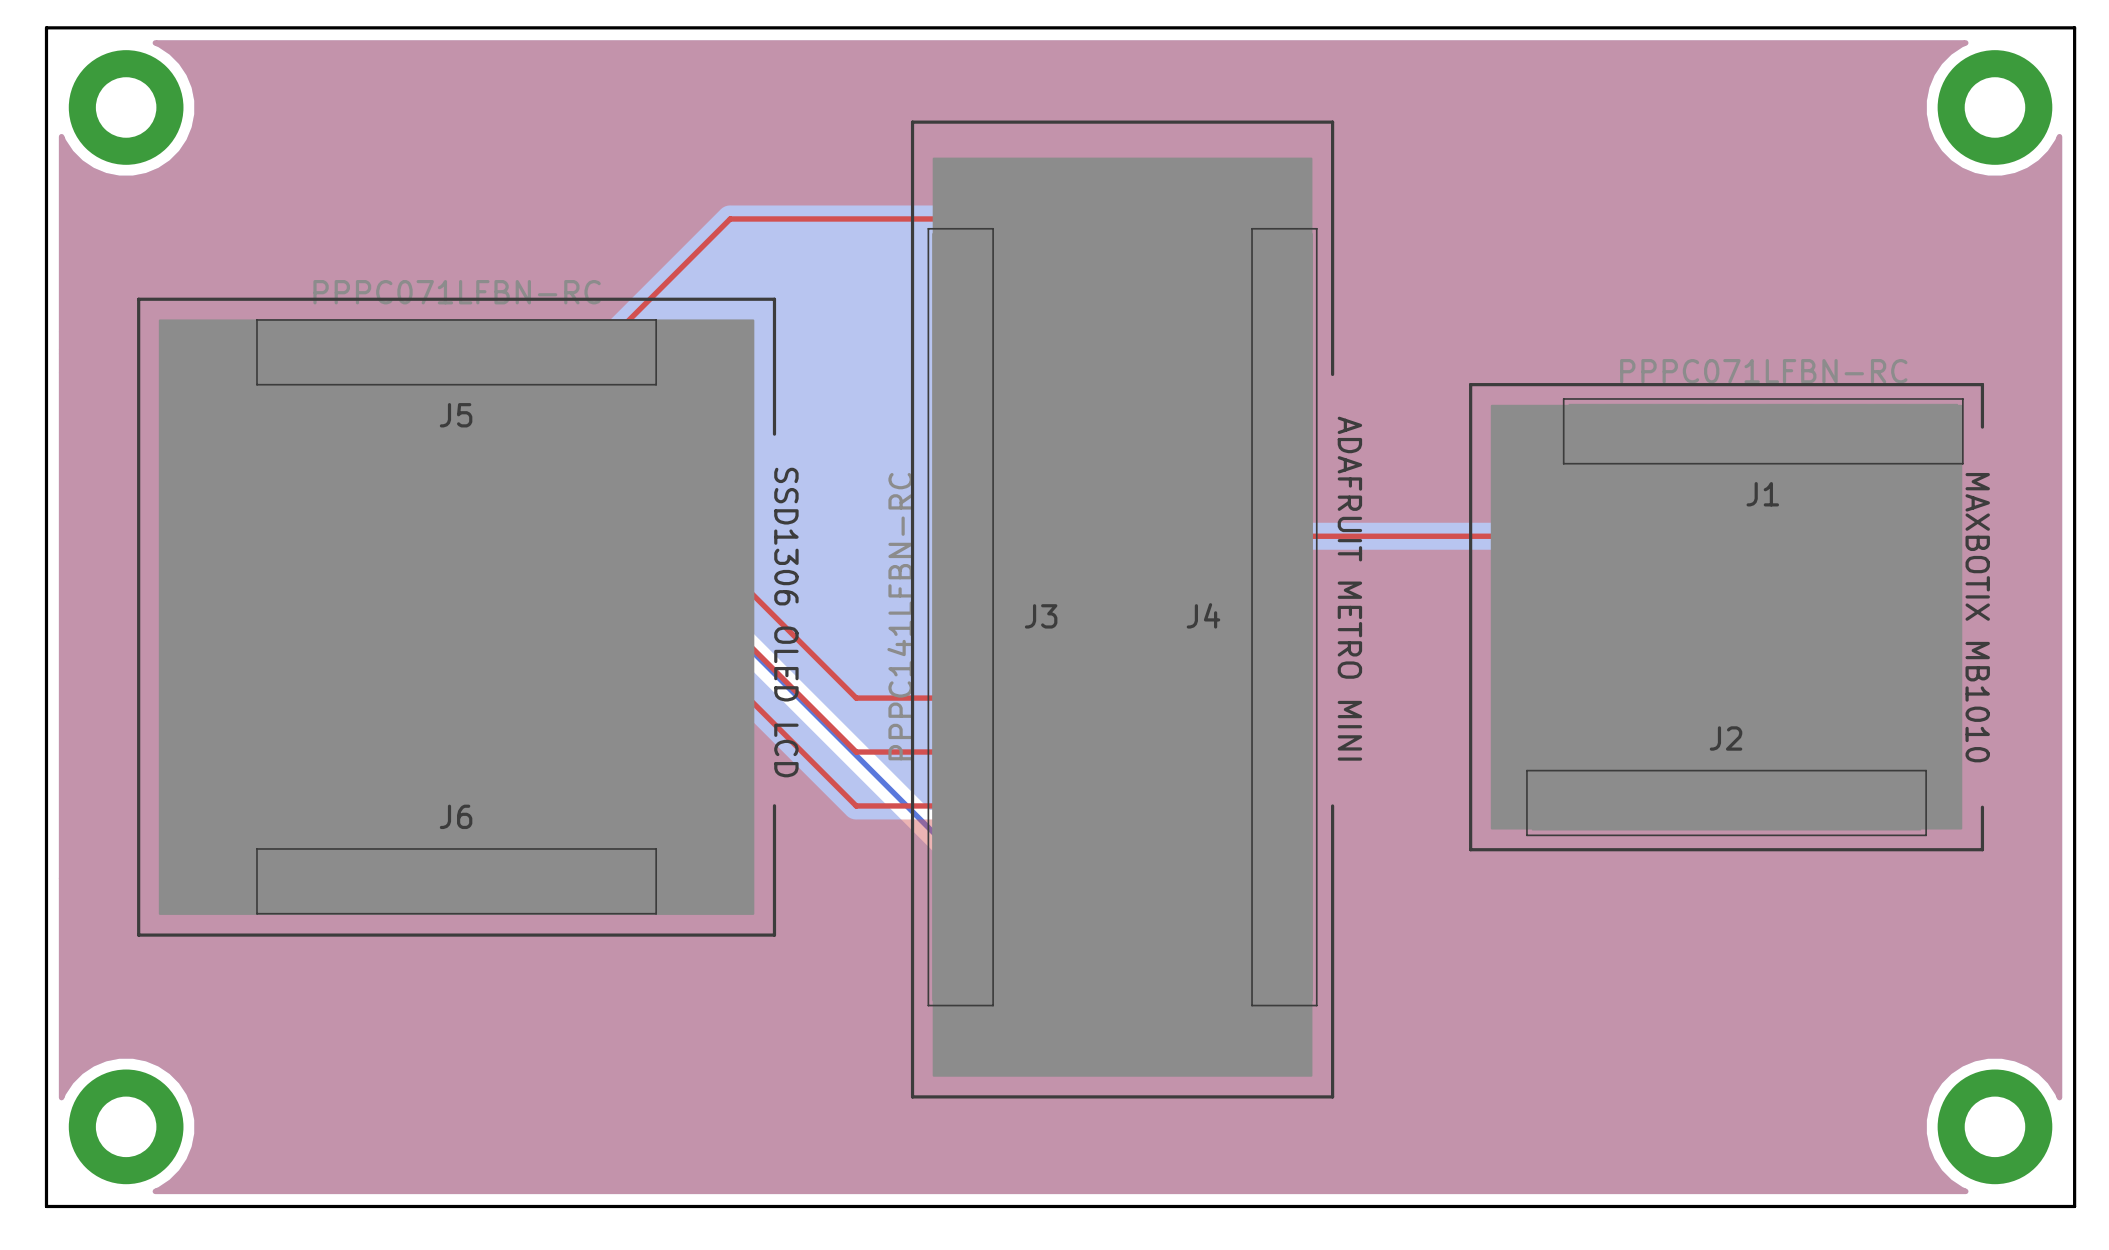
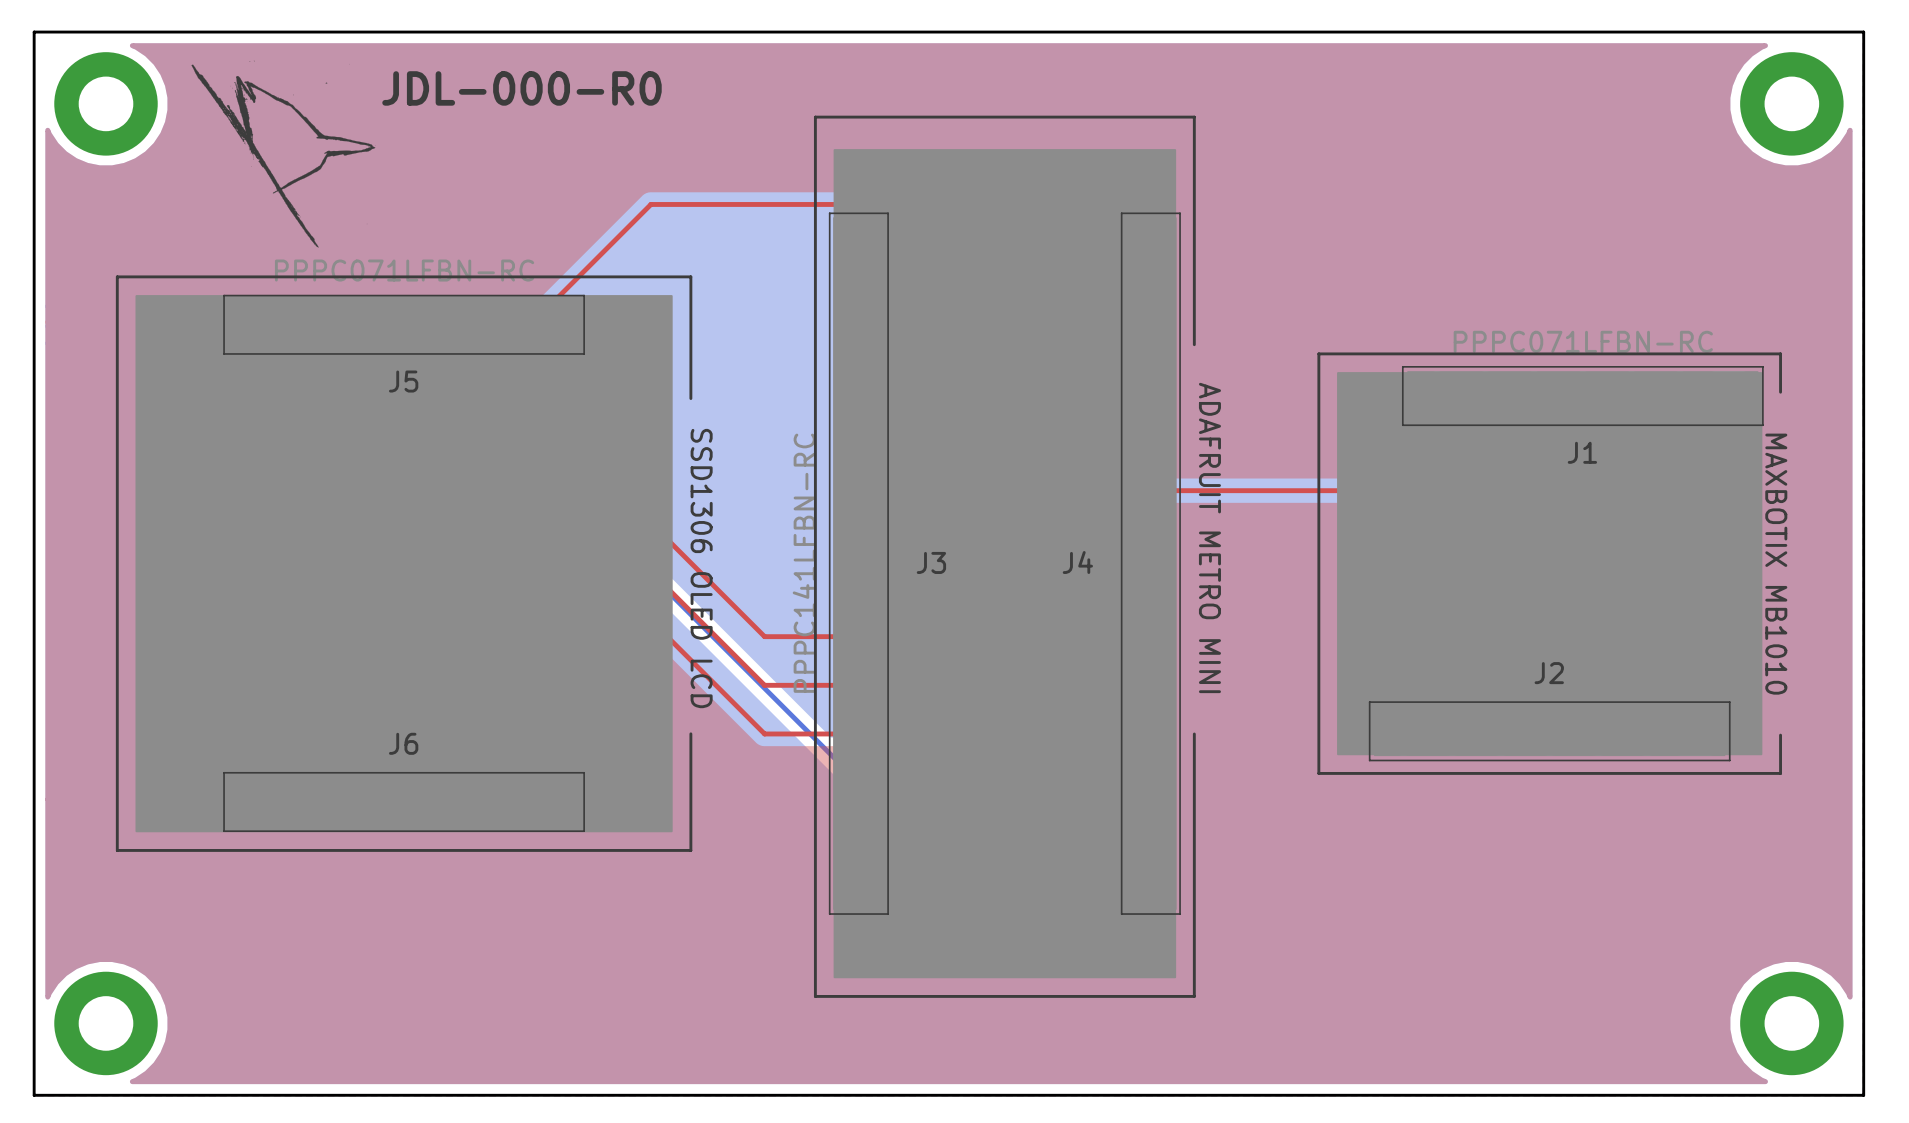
drawing: none -> [191, 60, 376, 248]
text: none -> JDL-000-R0 (521, 88)

